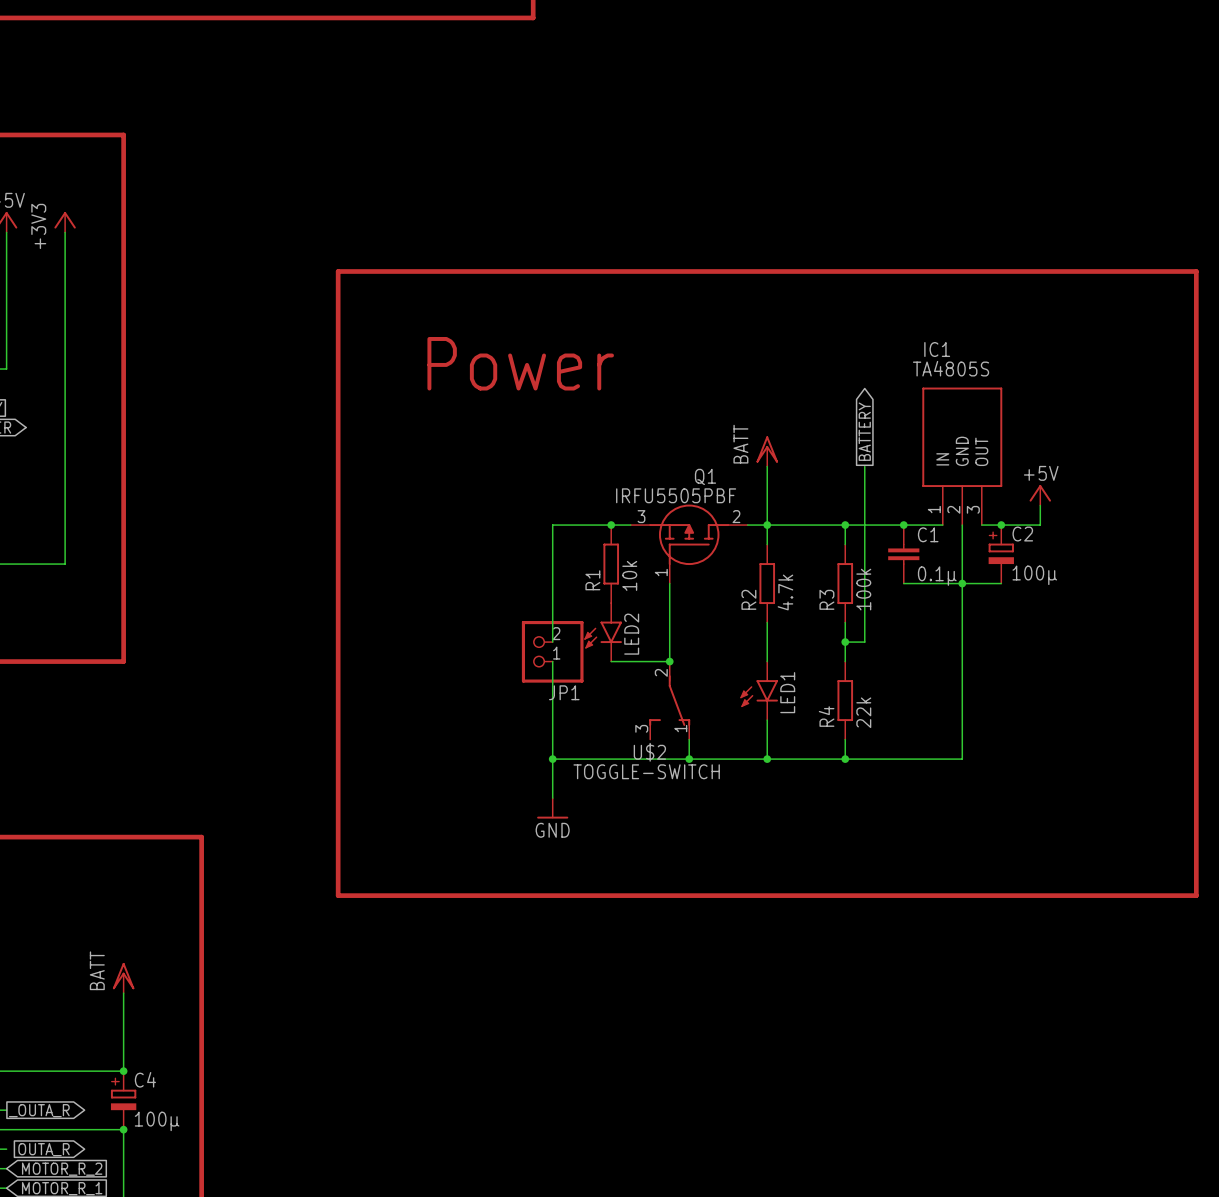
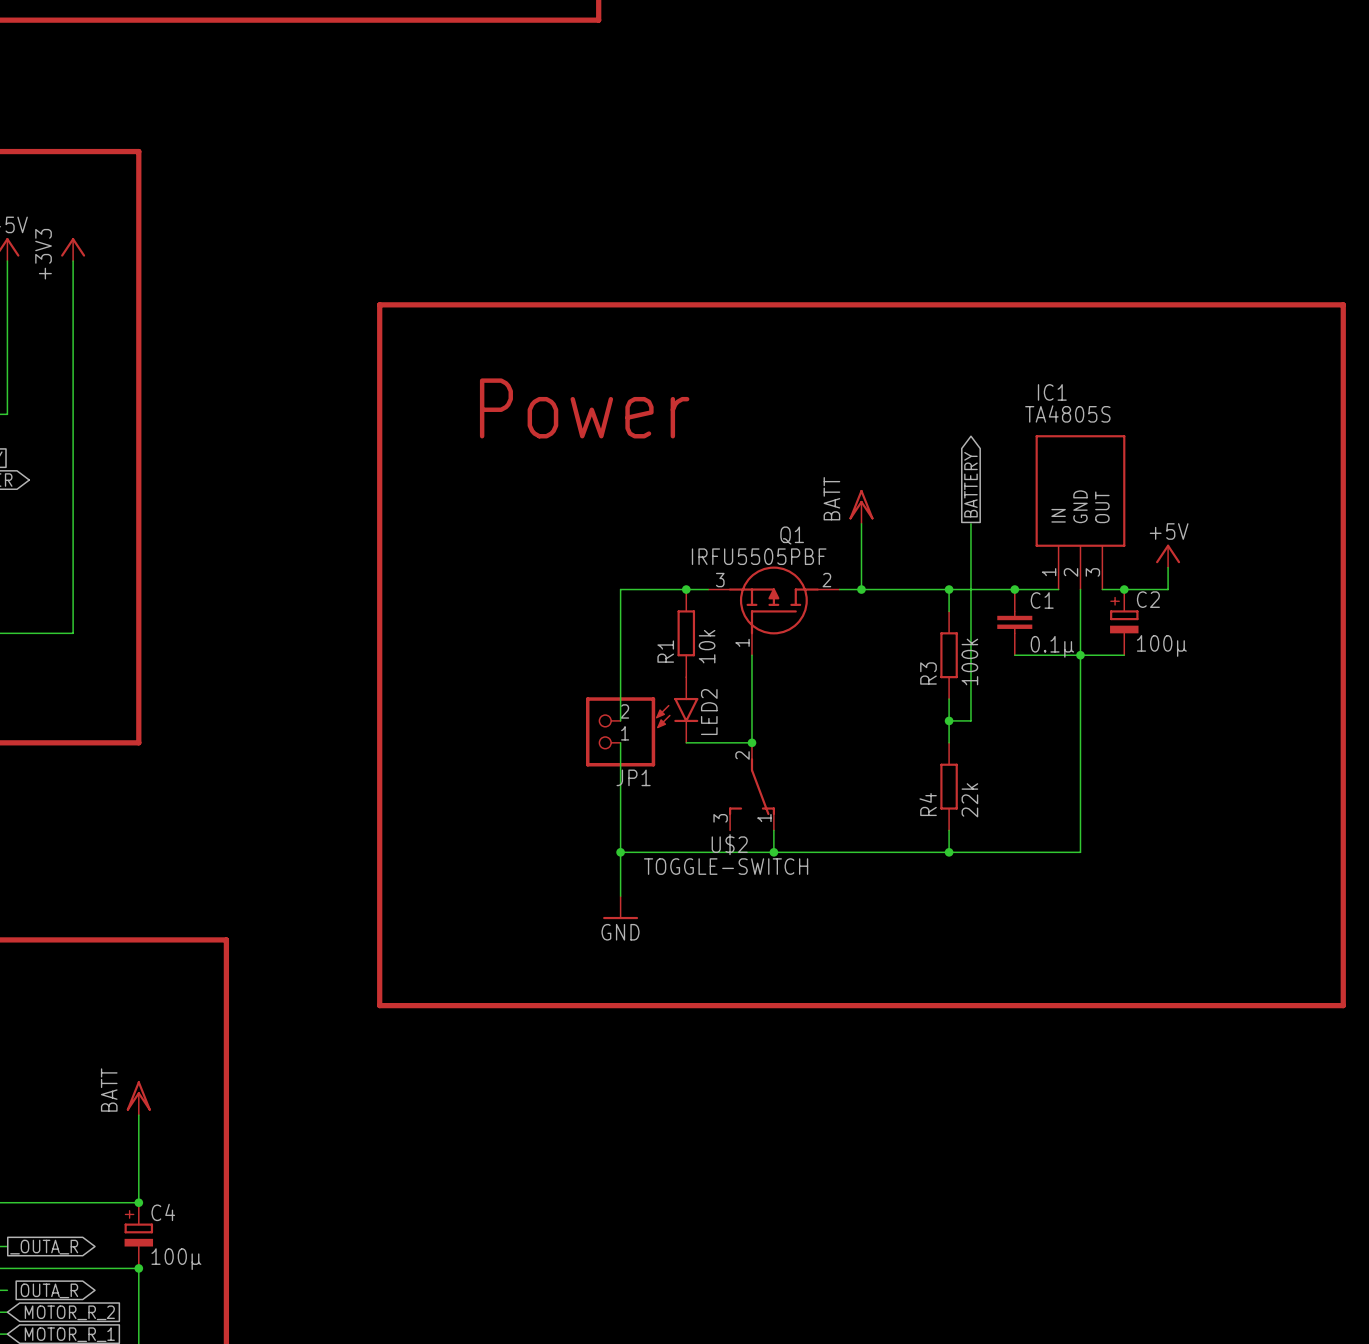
wire: (767, 525) (767, 544) -> none
R2: 4.7k (767, 583) -> none
wire: (767, 622) (767, 661) -> none
LED1: (759, 690) -> none
wire: (767, 720) (767, 759) -> none
junction: (767, 759) -> none

